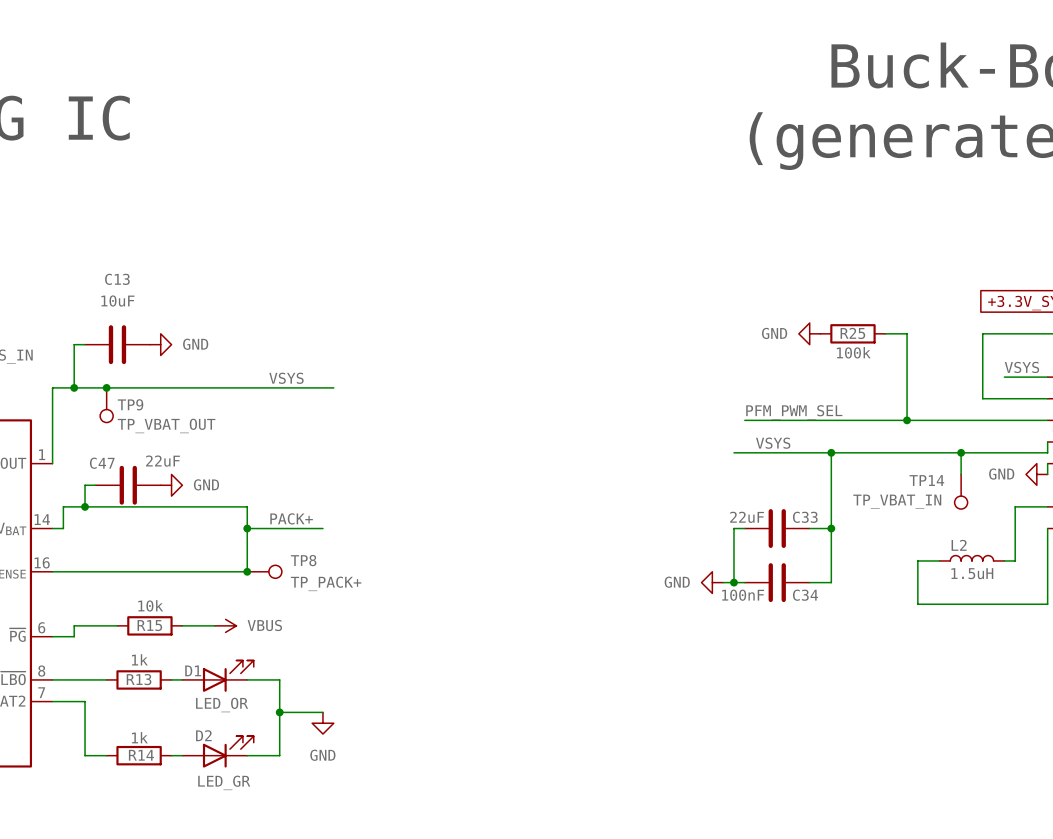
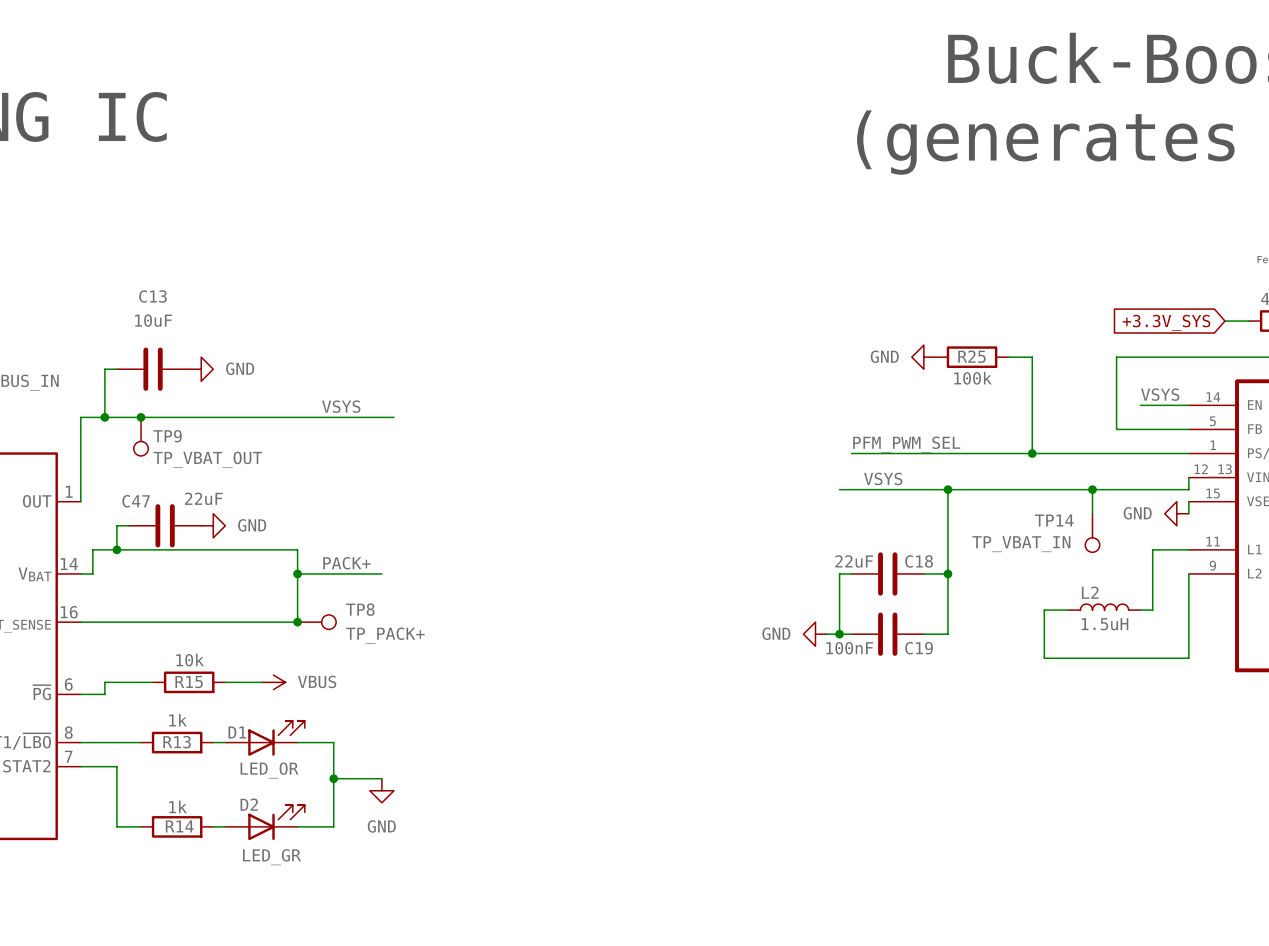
C33 name: C33 (805, 517) -> C18 (919, 561)
C34 name: C34 (805, 595) -> C19 (919, 648)

